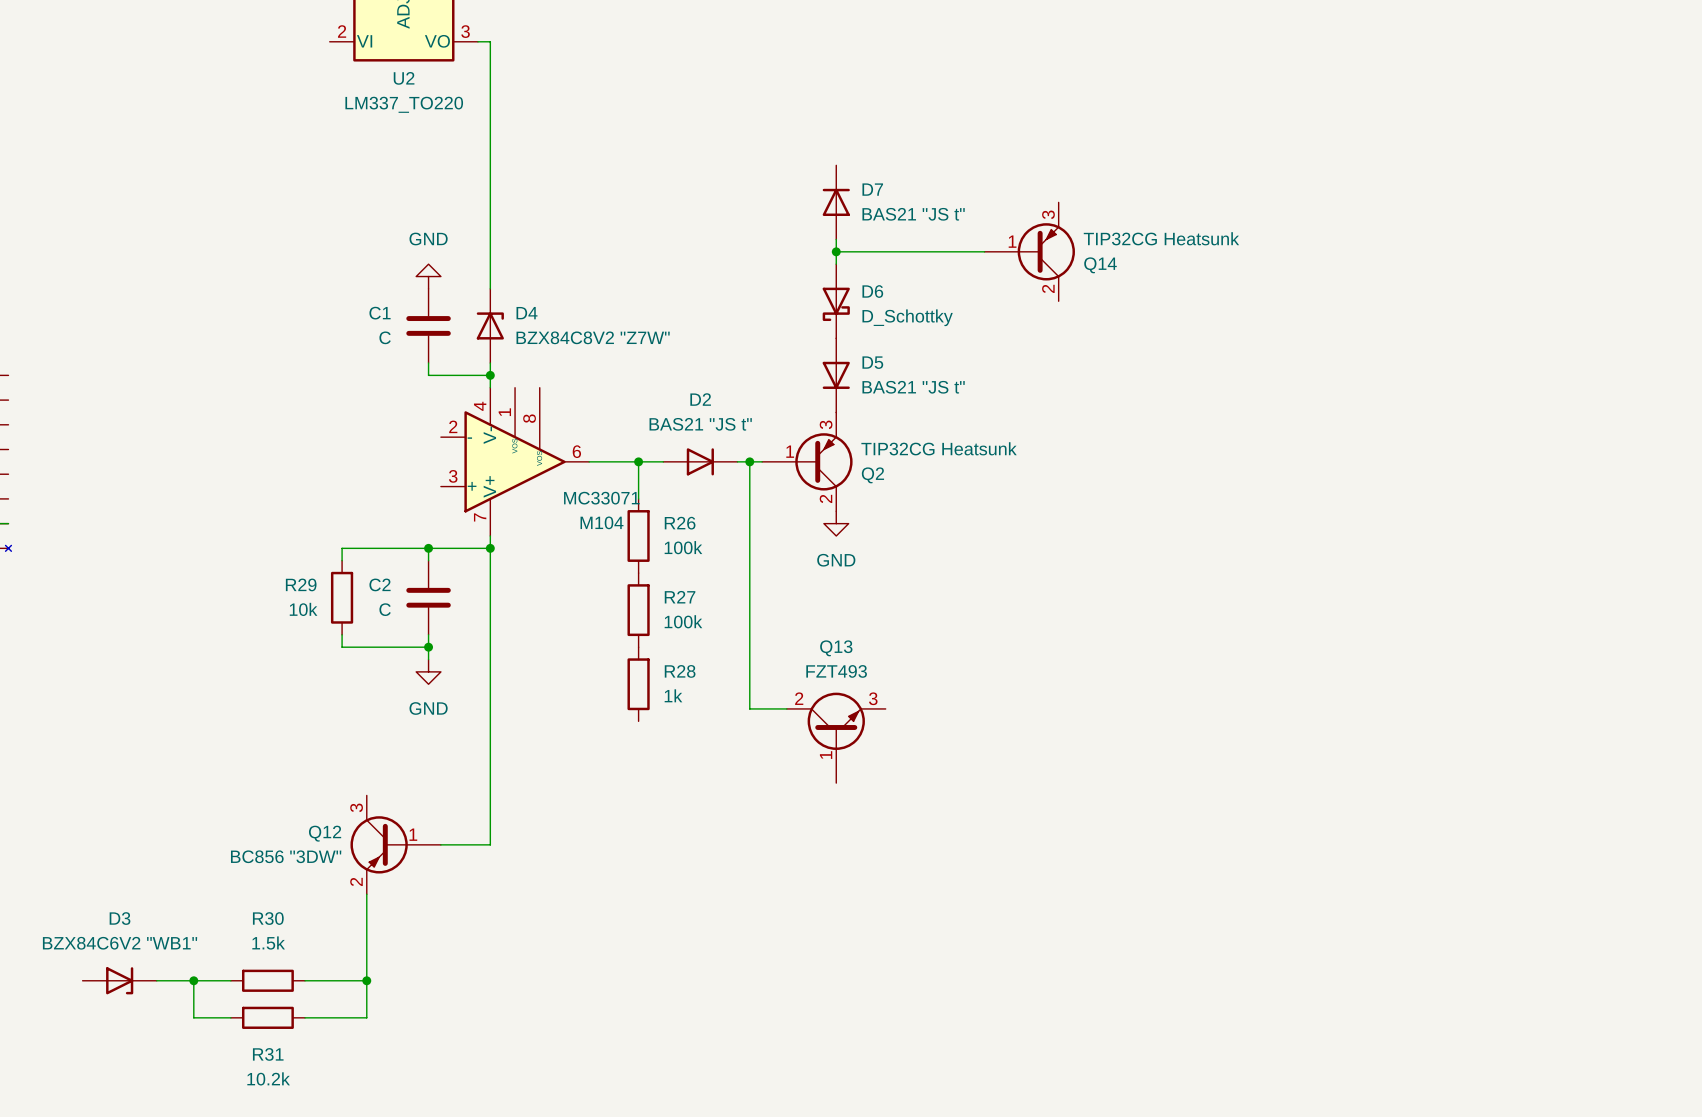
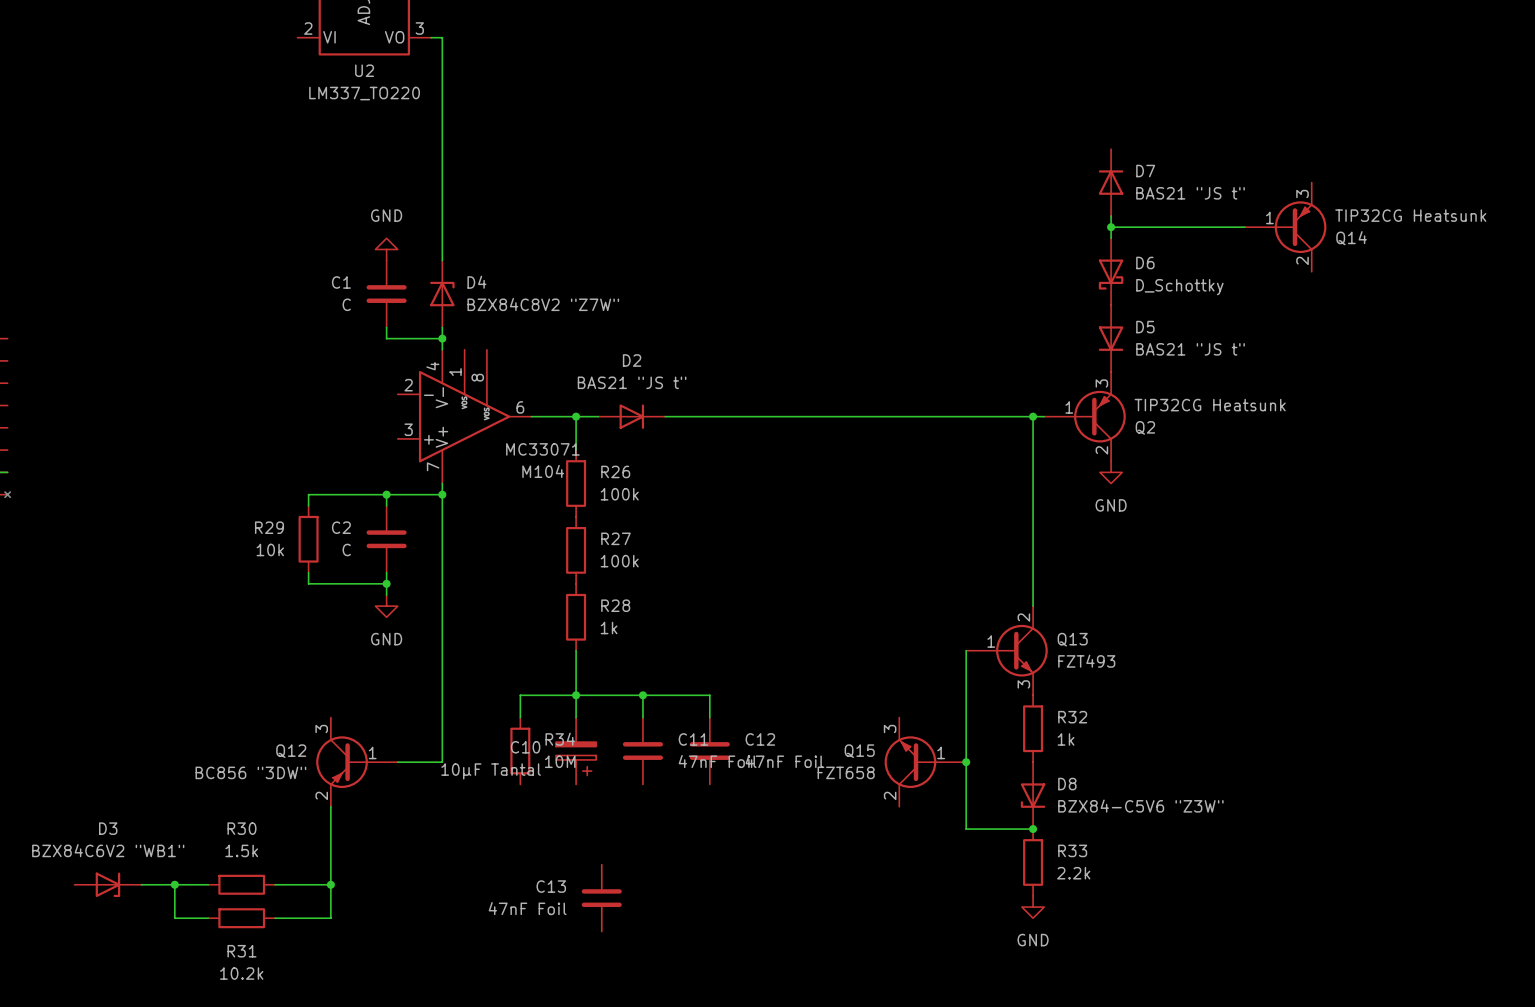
D7 position: (836, 202) -> (1111, 182)
wire: (836, 239) (836, 264) -> none
wire: none -> (1111, 216) (1111, 238)
wire: (836, 251) (984, 251) -> none
junction: (836, 251) -> none
Q14 position: (1029, 251) -> (1285, 227)
wire: none -> (1111, 227) (1244, 227)
junction: none -> (1111, 227)
D6 position: (836, 301) -> (1111, 271)
D5 position: (836, 375) -> (1111, 338)
wire: (749, 461) (749, 708) (786, 708) -> none
junction: (749, 461) -> none
wire: none -> (687, 416) (1044, 416)
Q2 position: (807, 461) -> (1085, 416)
wire: none -> (1033, 416) (1033, 606)
junction: none -> (1033, 416)
power symbol: GND (836, 523) -> none
power symbol: none -> GND (1111, 472)
Q13 value position: FZT493 (836, 671) -> FZT493 (1086, 661)
wire: none -> (576, 650) (576, 717)
Q13 rotation: 0° (836, 721) -> 90° clockwise (1021, 650)
wire: none -> (966, 650) (966, 829) (1033, 829)
Q13 position: (836, 737) -> (1006, 650)
junction: none -> (576, 695)
wire: none -> (642, 695) (642, 717)
junction: none -> (642, 695)
wire: none -> (520, 717) (520, 695) (709, 695) (709, 717)
R32: none -> 1k (1033, 728)
R34: none -> 10M (520, 751)
C10: none -> 10µF Tantal (576, 751)
C11: none -> 47nF Foil (642, 751)
C12: none -> 47nF Foil (709, 751)
Q15: none -> FZT658 (925, 762)
junction: none -> (966, 762)
D8: none -> BZX84-C5V6 "Z3W" (1033, 795)
junction: none -> (1033, 829)
R33: none -> 2.2k (1033, 862)
C13: none -> 47nF Foil (601, 898)
power symbol: none -> GND (1033, 907)

